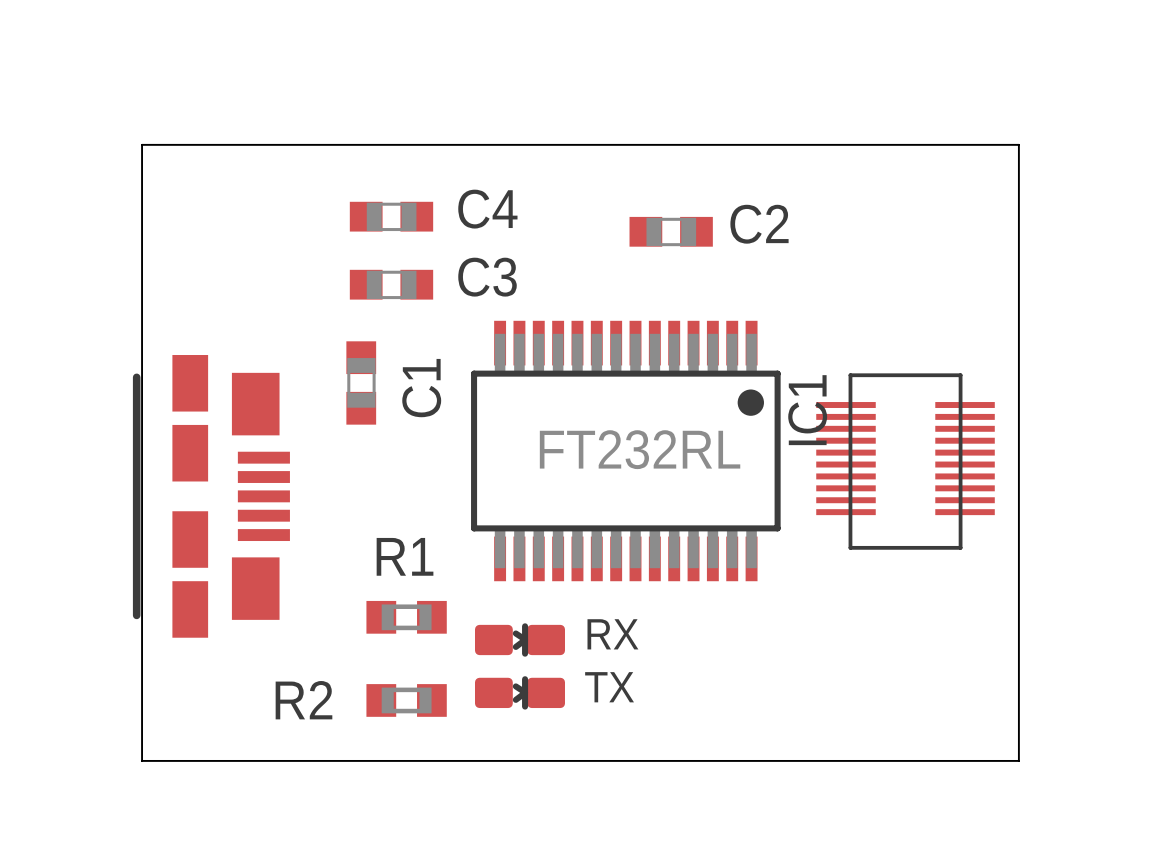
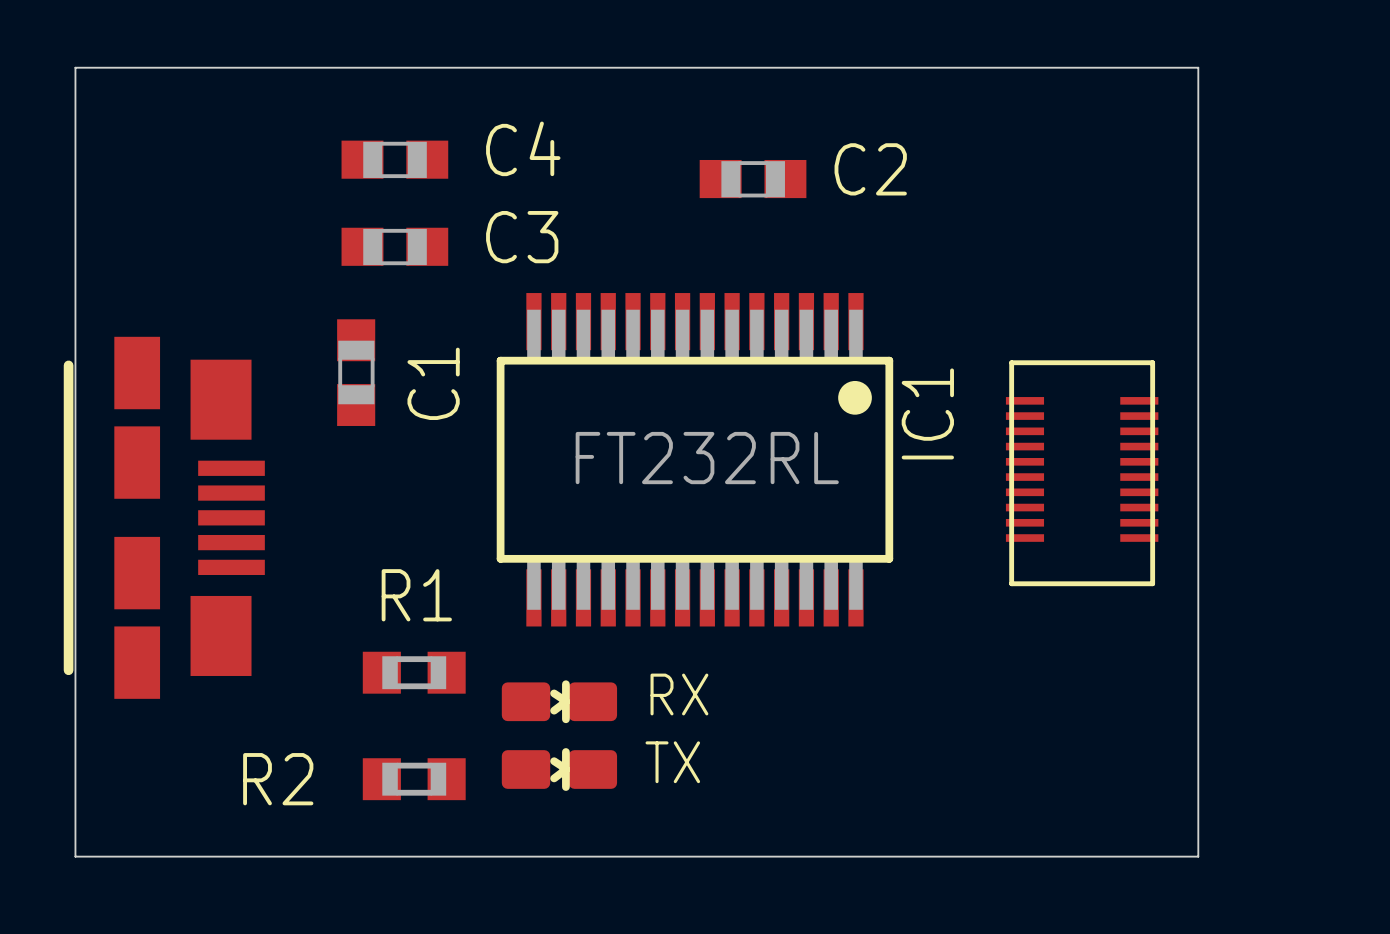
part footprint: [816, 373, 995, 550] -> [1005, 360, 1159, 587]

